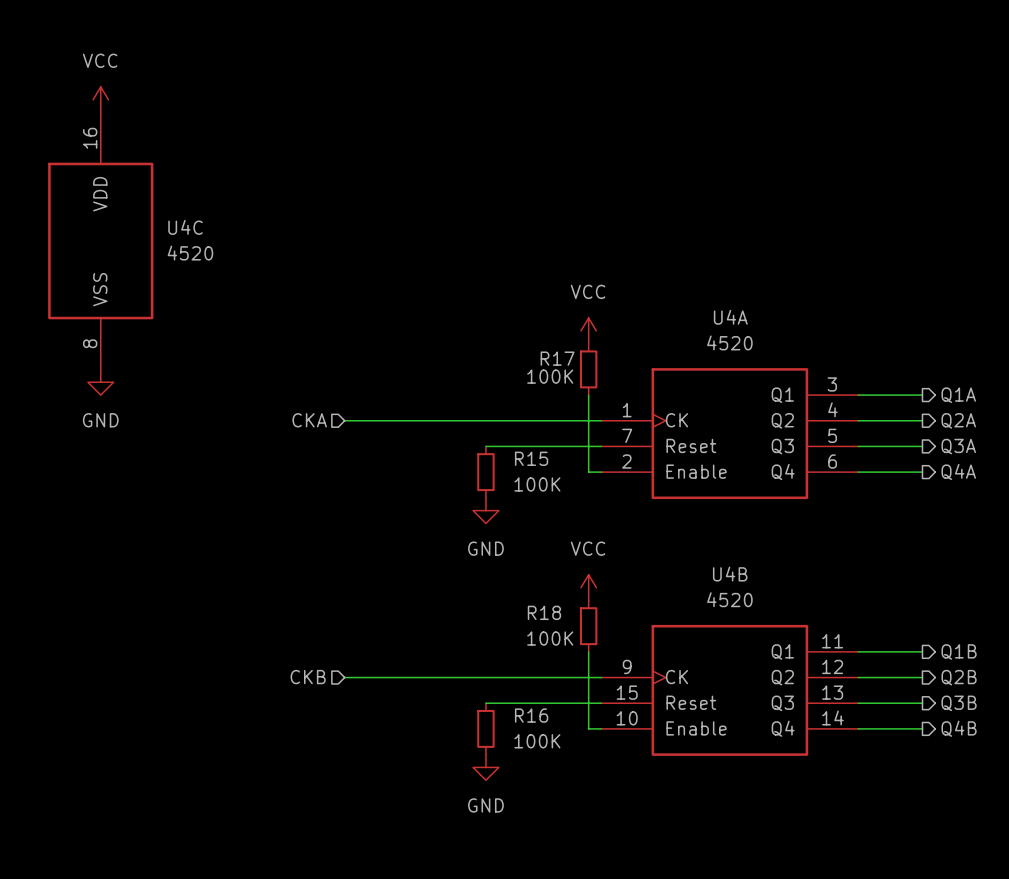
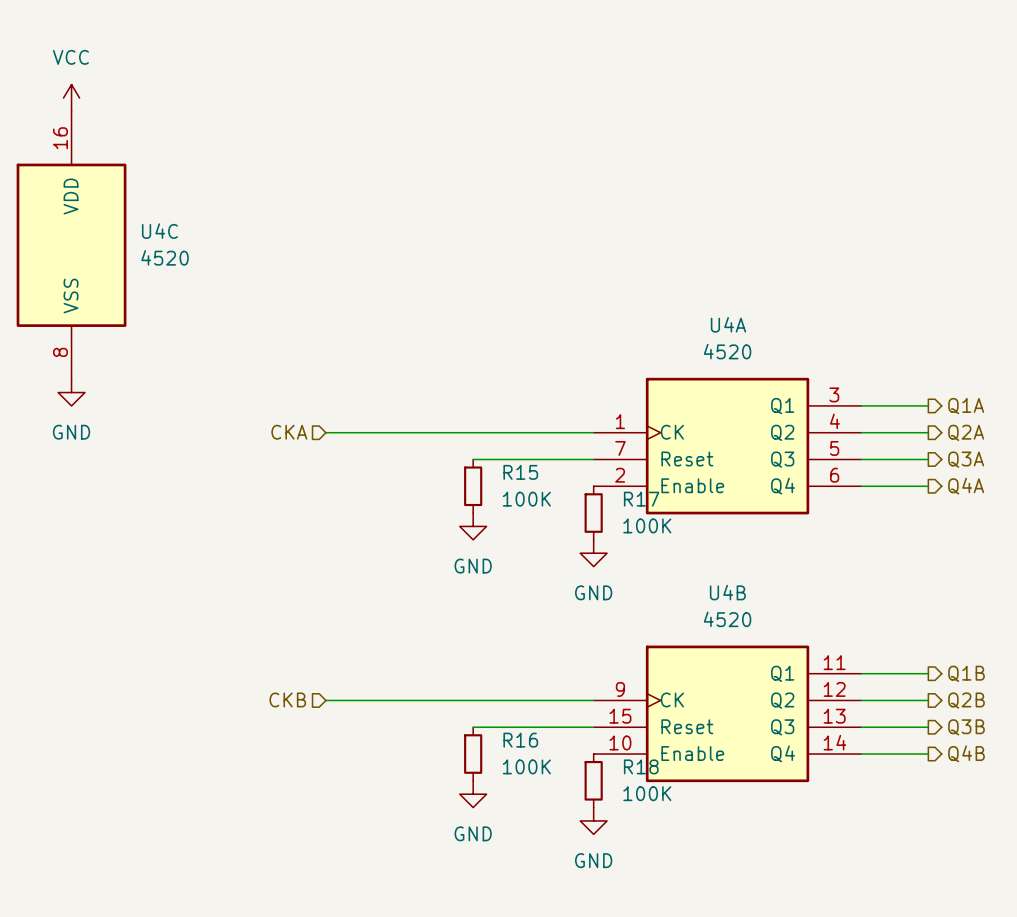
power symbol: VCC (588, 330) -> none
R17 name position: R17 (557, 358) -> R17 (641, 499)
R17 position: (588, 369) -> (593, 513)
R17 value position: 100K (550, 376) -> 100K (647, 525)
wire: (588, 395) (588, 472) (601, 472) -> none
power symbol: none -> GND (593, 553)
power symbol: VCC (588, 587) -> none
R18 name position: R18 (544, 612) -> R18 (641, 766)
R18 position: (588, 626) -> (593, 780)
R18 value position: 100K (550, 638) -> 100K (647, 793)
wire: (588, 651) (588, 728) (601, 728) -> none
power symbol: none -> GND (593, 820)

